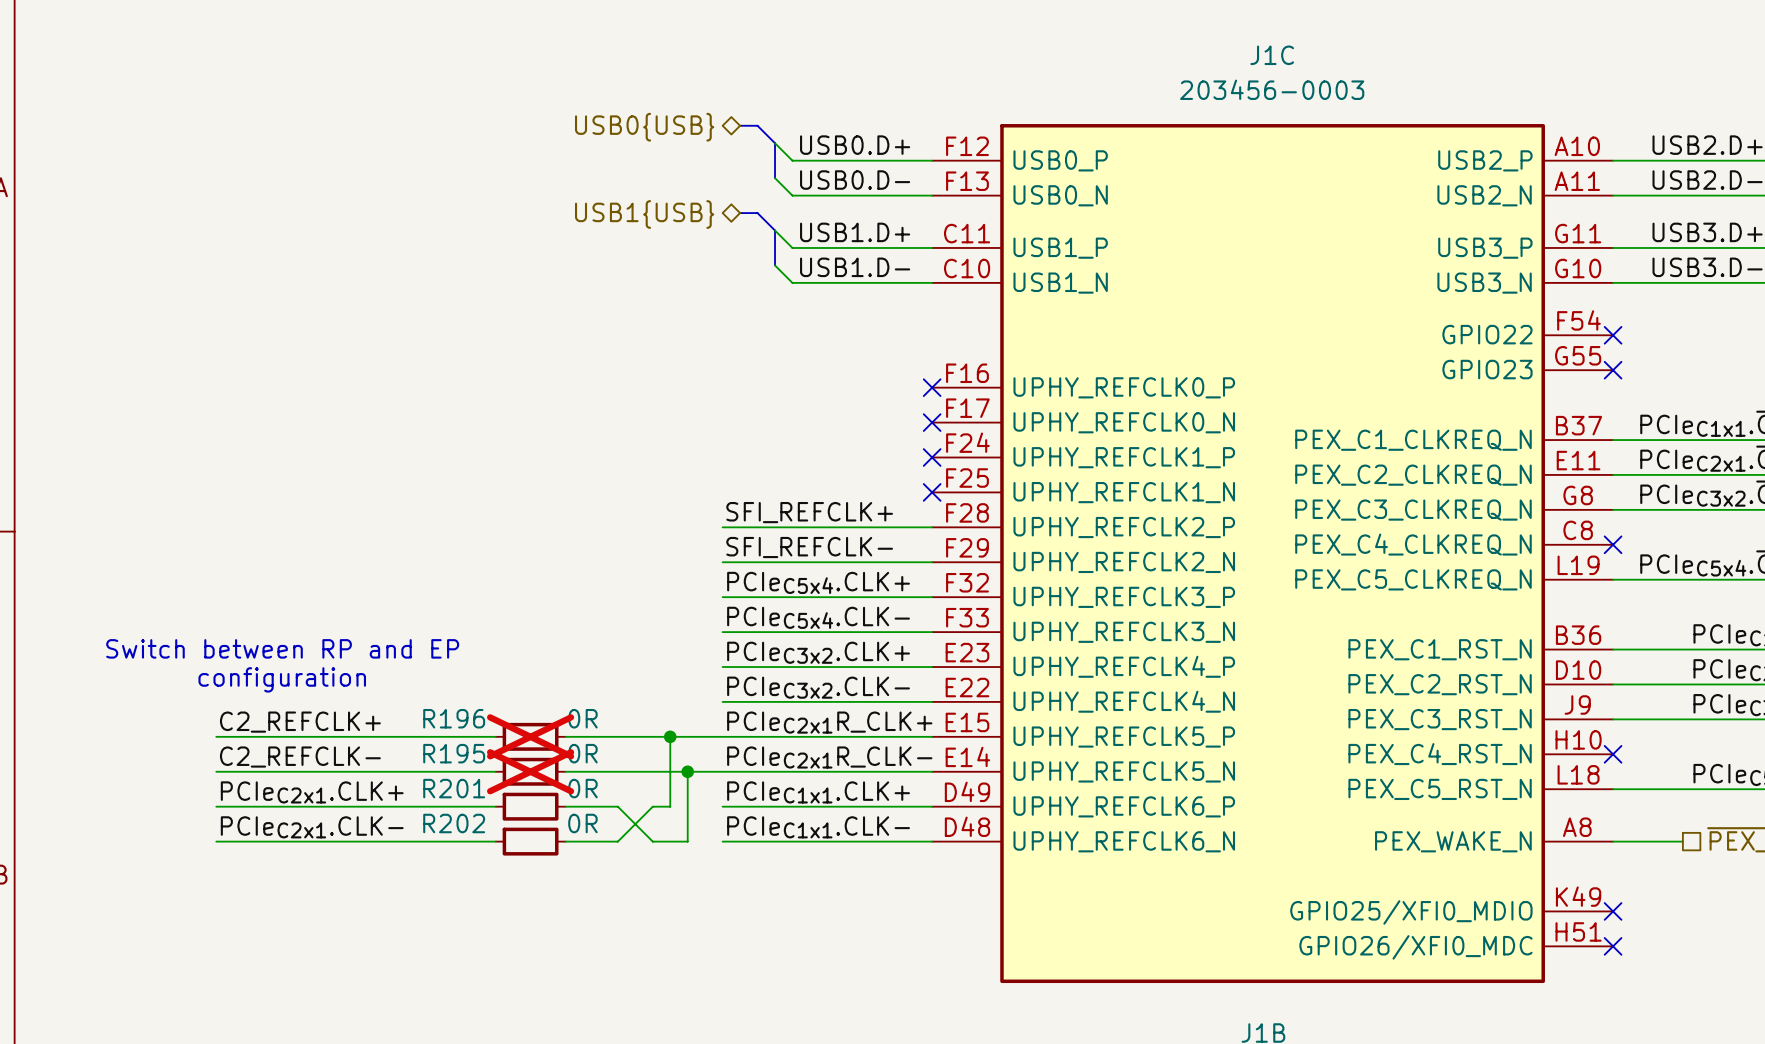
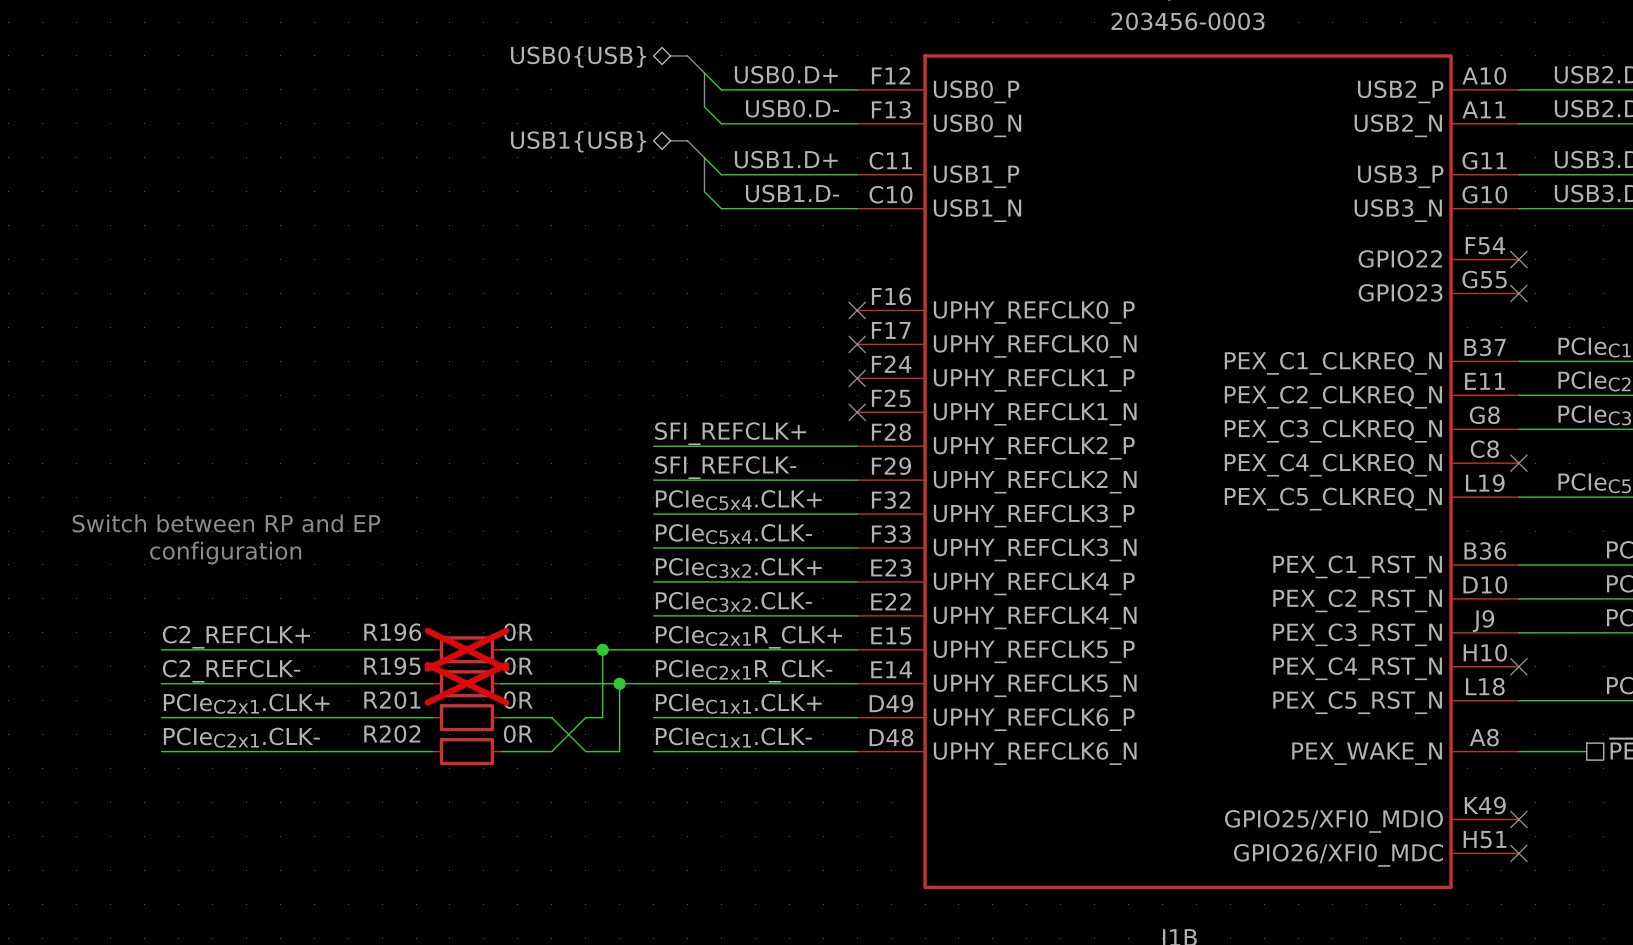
text position: Switch between RP and EP (282, 648) -> Switch between RP and EP (226, 523)
text position: configuration (282, 679) -> configuration (225, 552)

